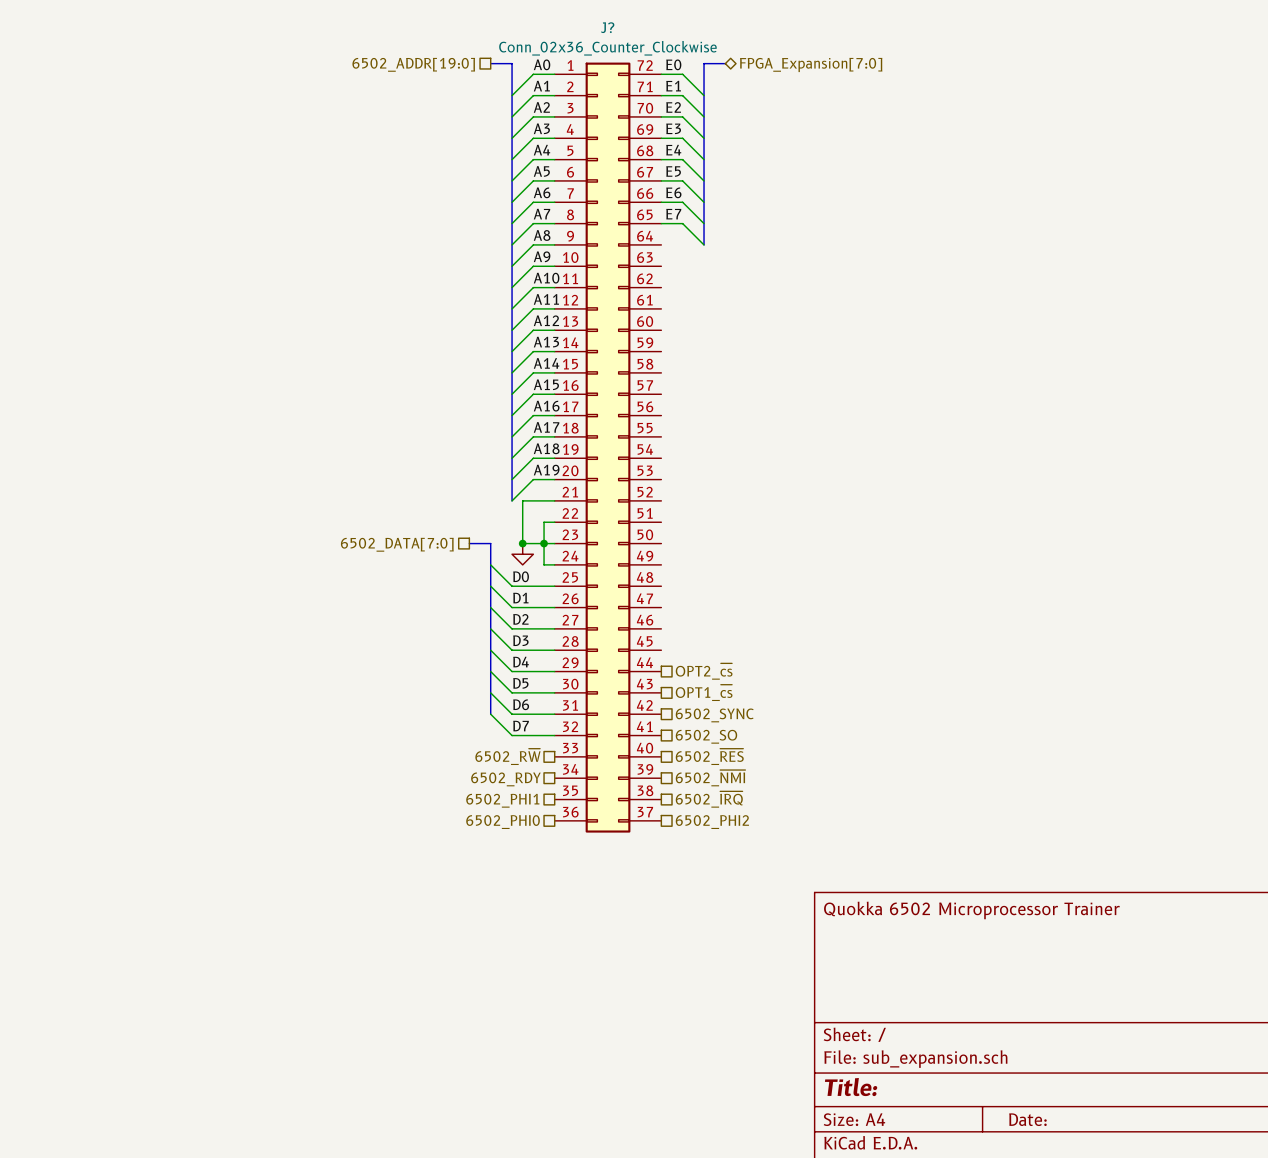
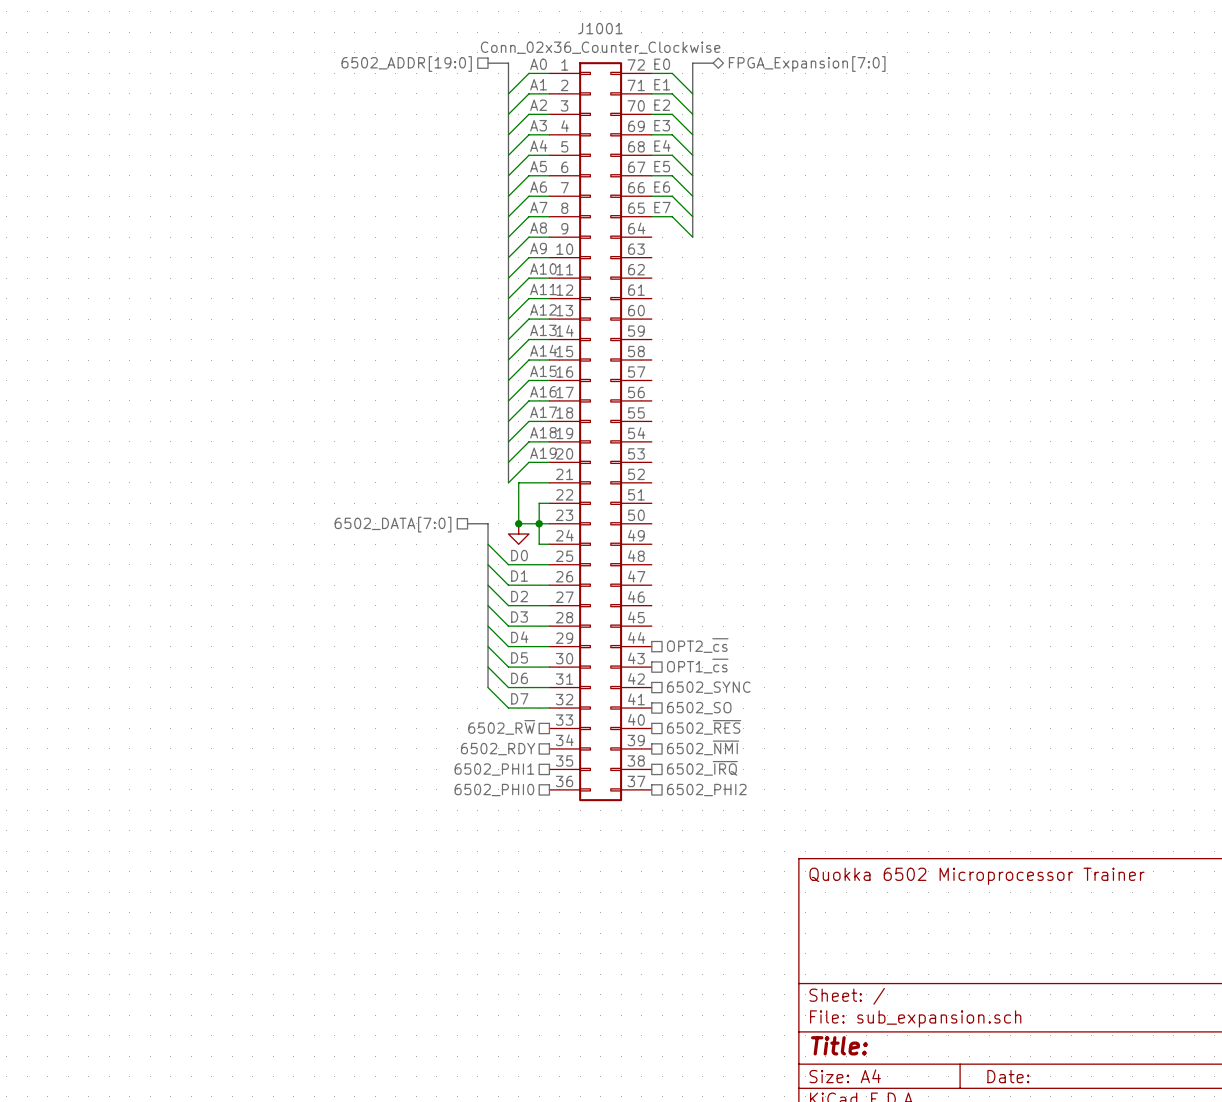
J? name: J? (607, 27) -> J1001 (600, 28)

